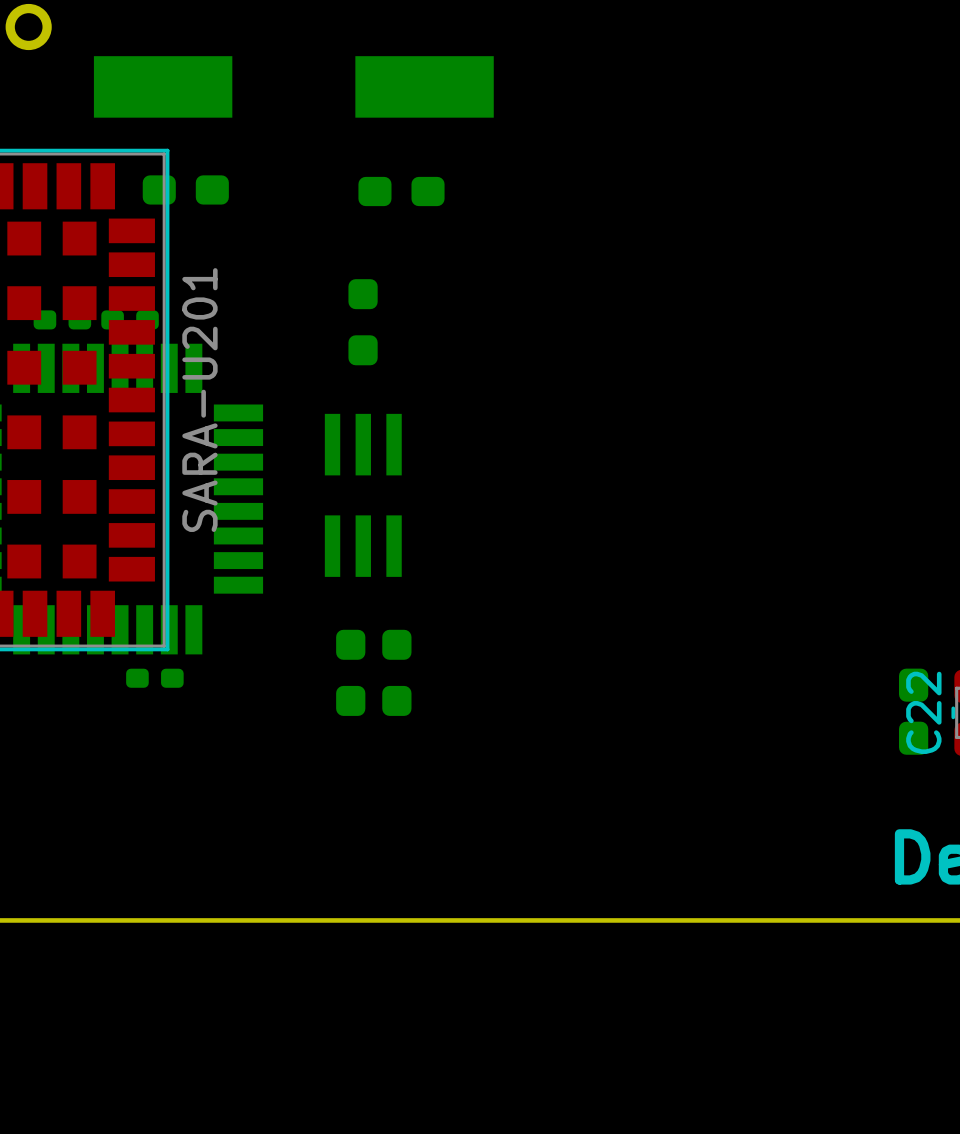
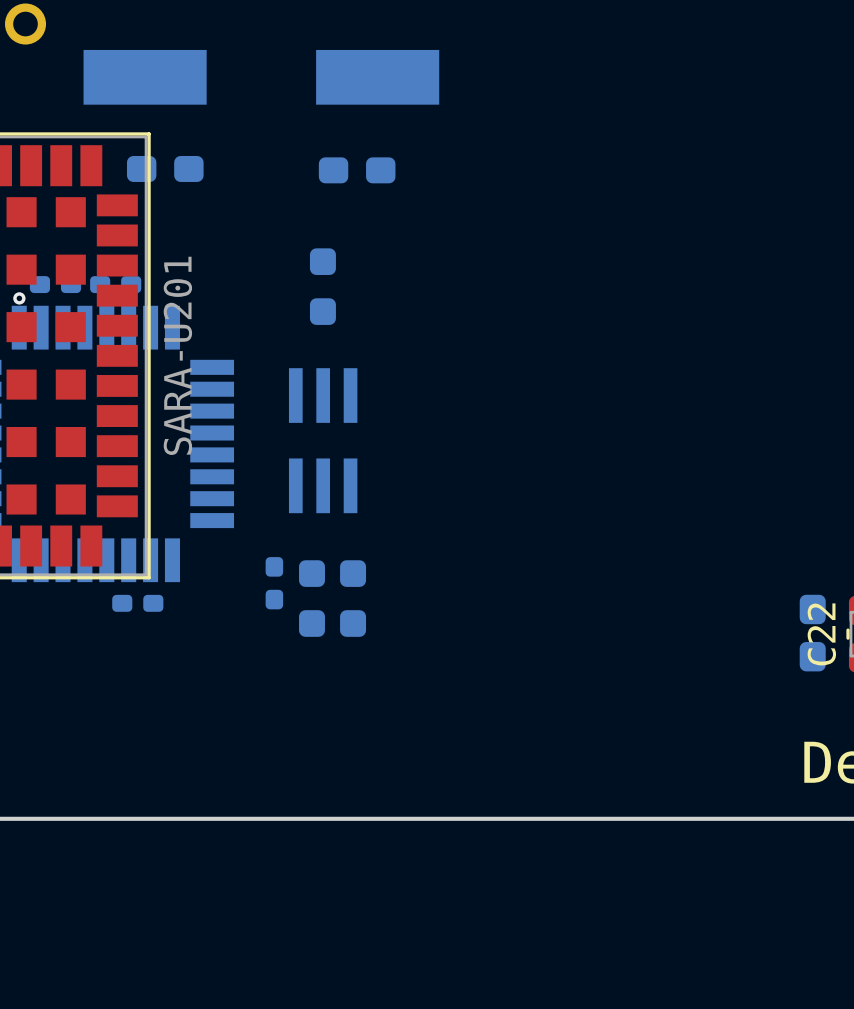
via: none -> (19, 298)
part: none -> (274, 583)

